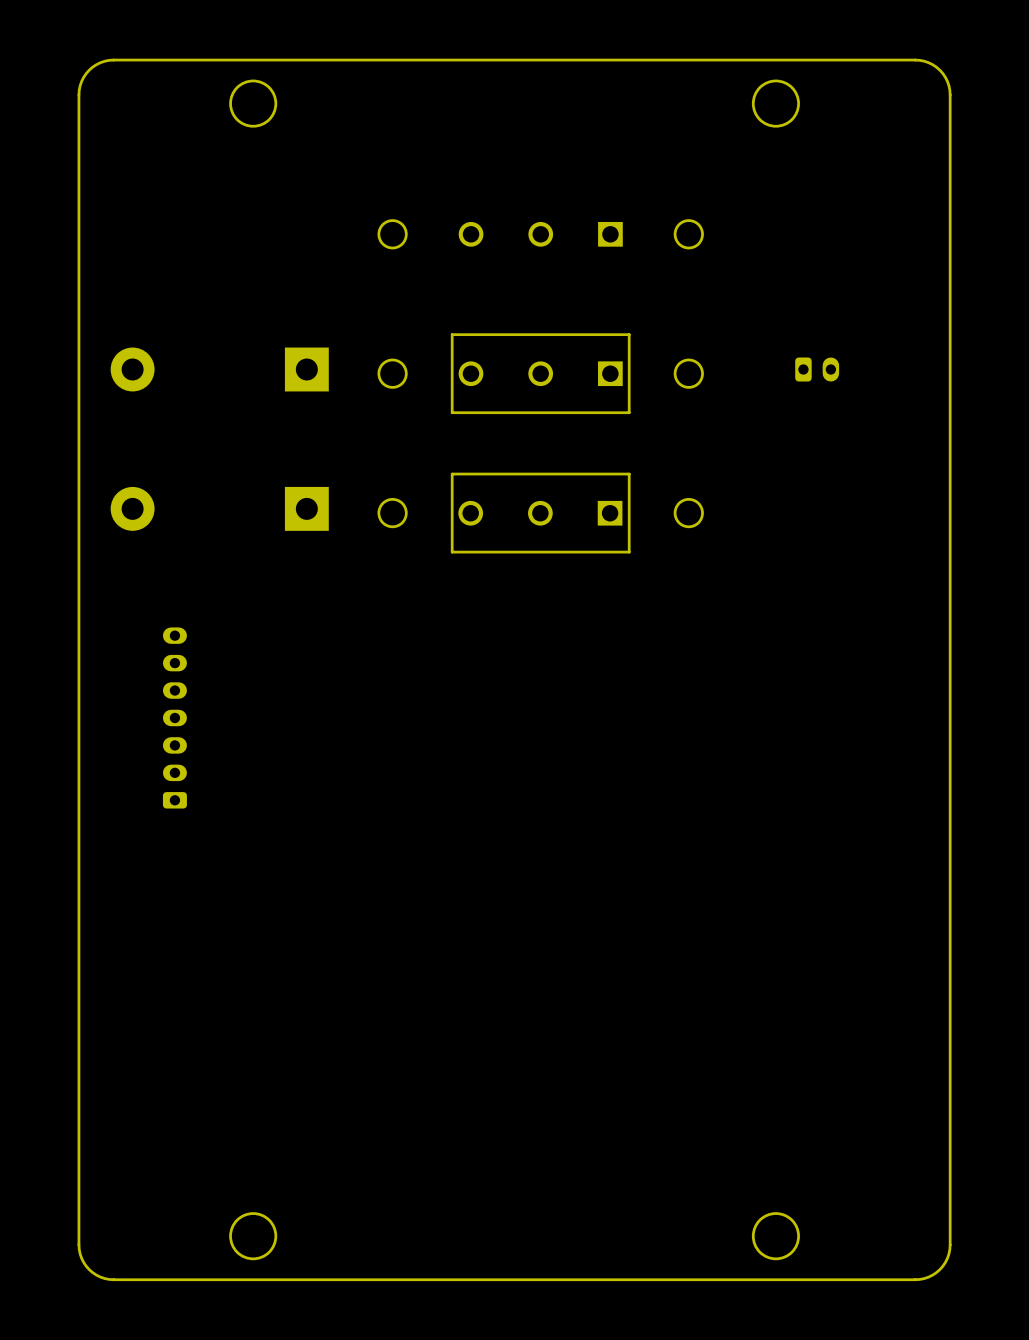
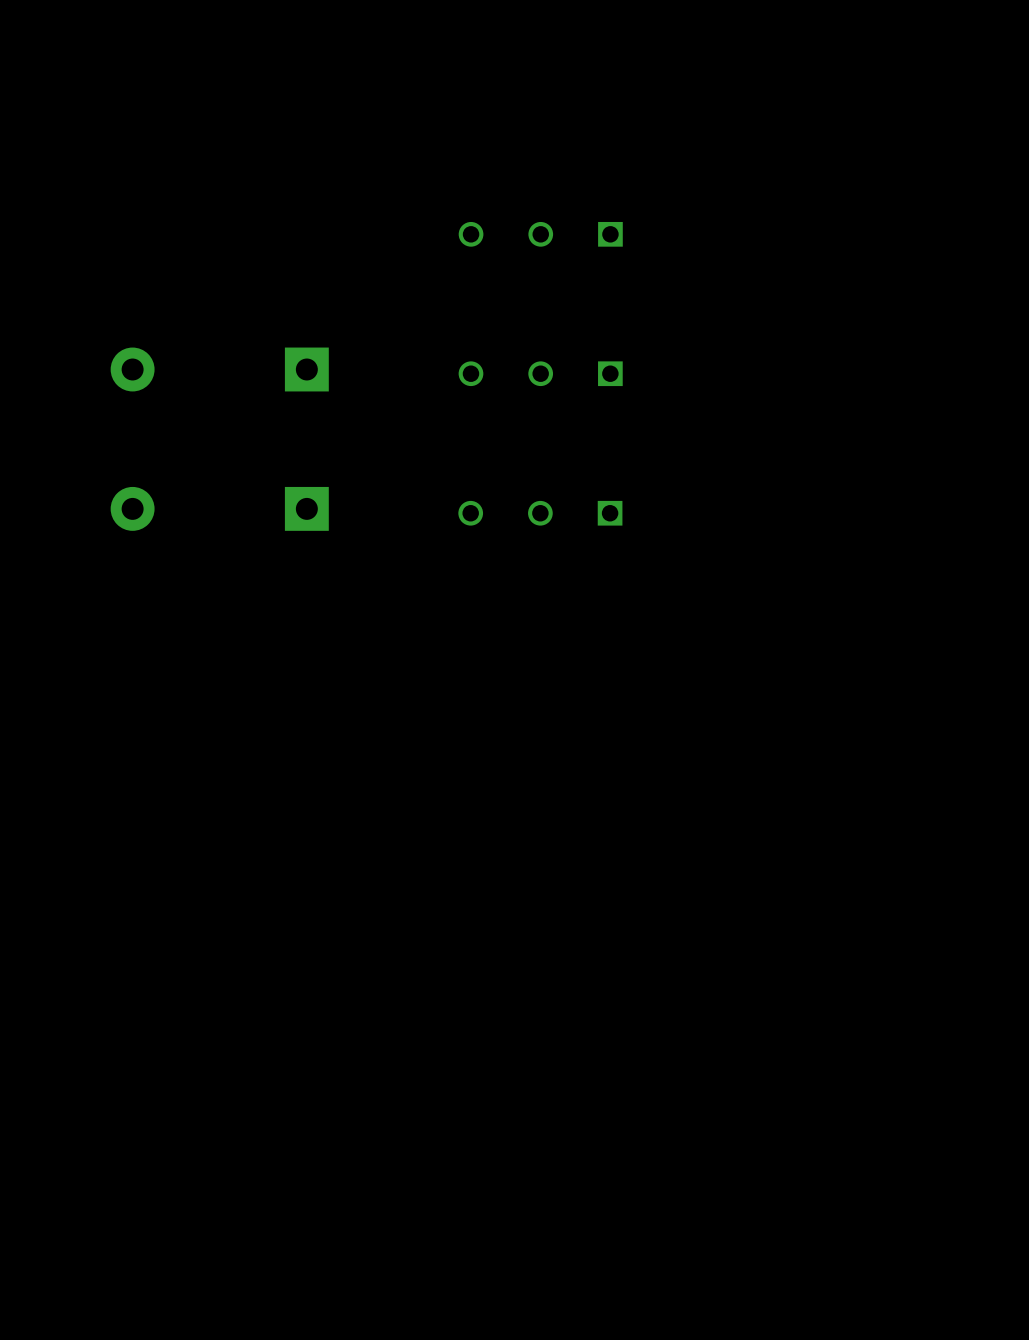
board edge: (915, 60) (113, 60) (96, 64) (86, 73) (80, 85) (78, 94) (78, 1244) (81, 1258) (92, 1272) (100, 1277) (113, 1279) (915, 1279) (928, 1277) (942, 1266) (948, 1253) (950, 1244) (950, 94) (947, 81) (939, 70) (928, 62) (915, 60) -> none
round board edge: [229, 79, 278, 128] -> none
round board edge: [751, 79, 800, 128] -> none
round board edge: [377, 219, 408, 250] -> none
round board edge: [673, 219, 704, 250] -> none
board edge: (629, 334) (629, 412) (452, 412) (452, 334) (629, 334) -> none
round board edge: [377, 358, 408, 389] -> none
round board edge: [673, 358, 704, 389] -> none
part: (817, 369) -> none
board edge: (629, 474) (452, 474) (452, 552) (629, 552) (629, 474) -> none
round board edge: [377, 497, 408, 529] -> none
round board edge: [673, 497, 704, 529] -> none
part: (174, 717) -> none
round board edge: [229, 1212, 278, 1261] -> none
round board edge: [751, 1212, 800, 1261] -> none

